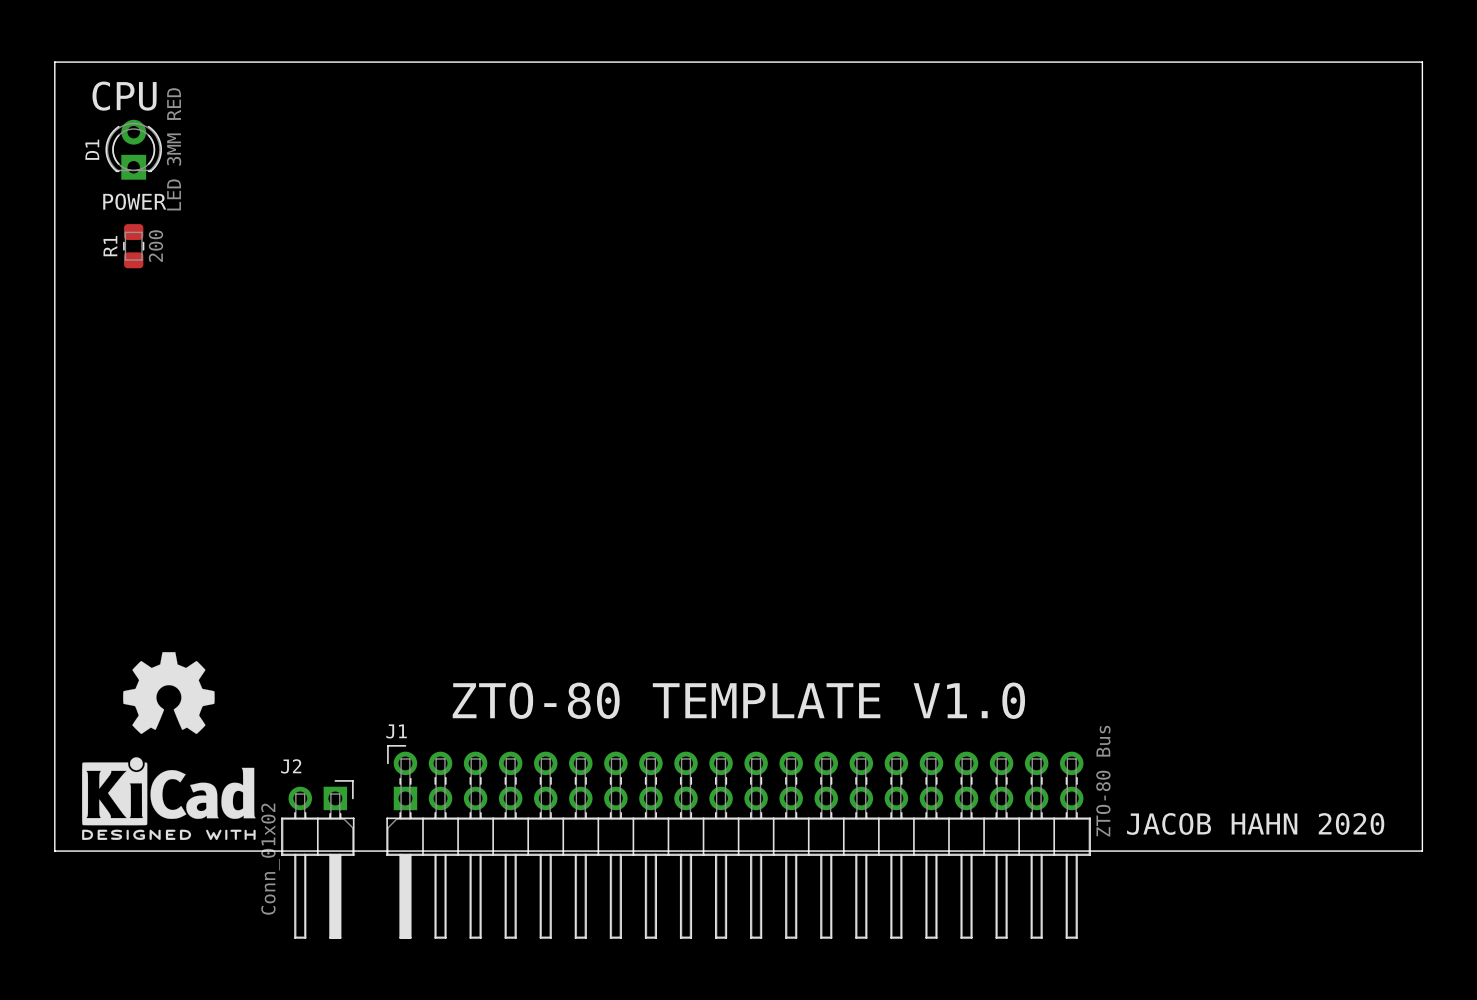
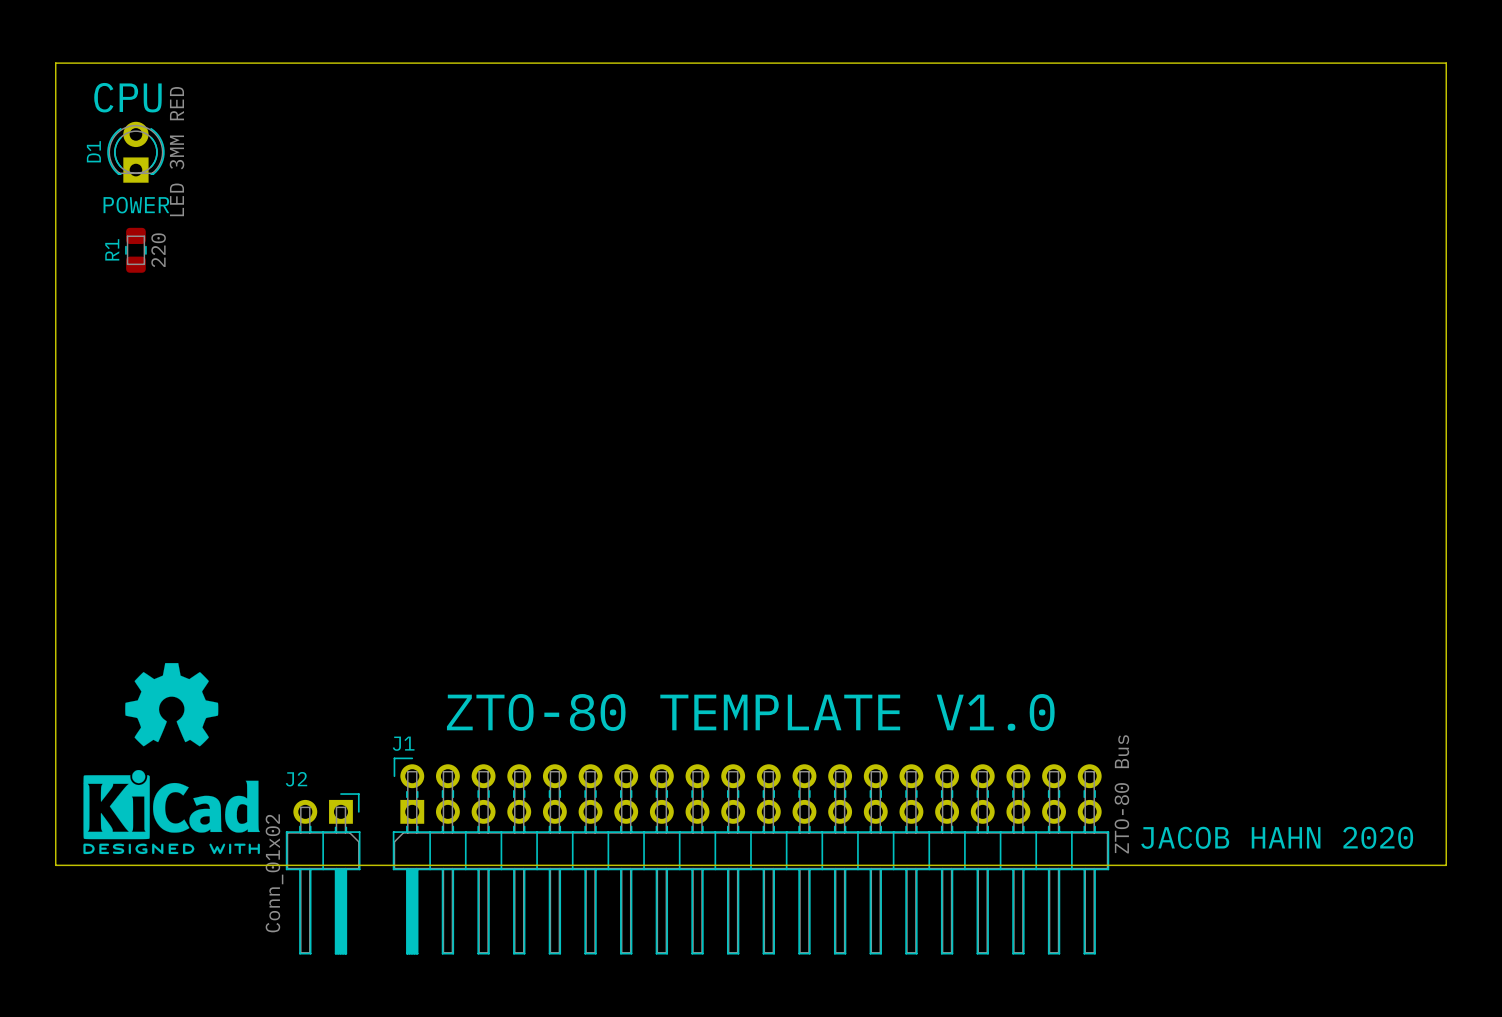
R1 value: 200 (155, 246) -> 220 (158, 250)

